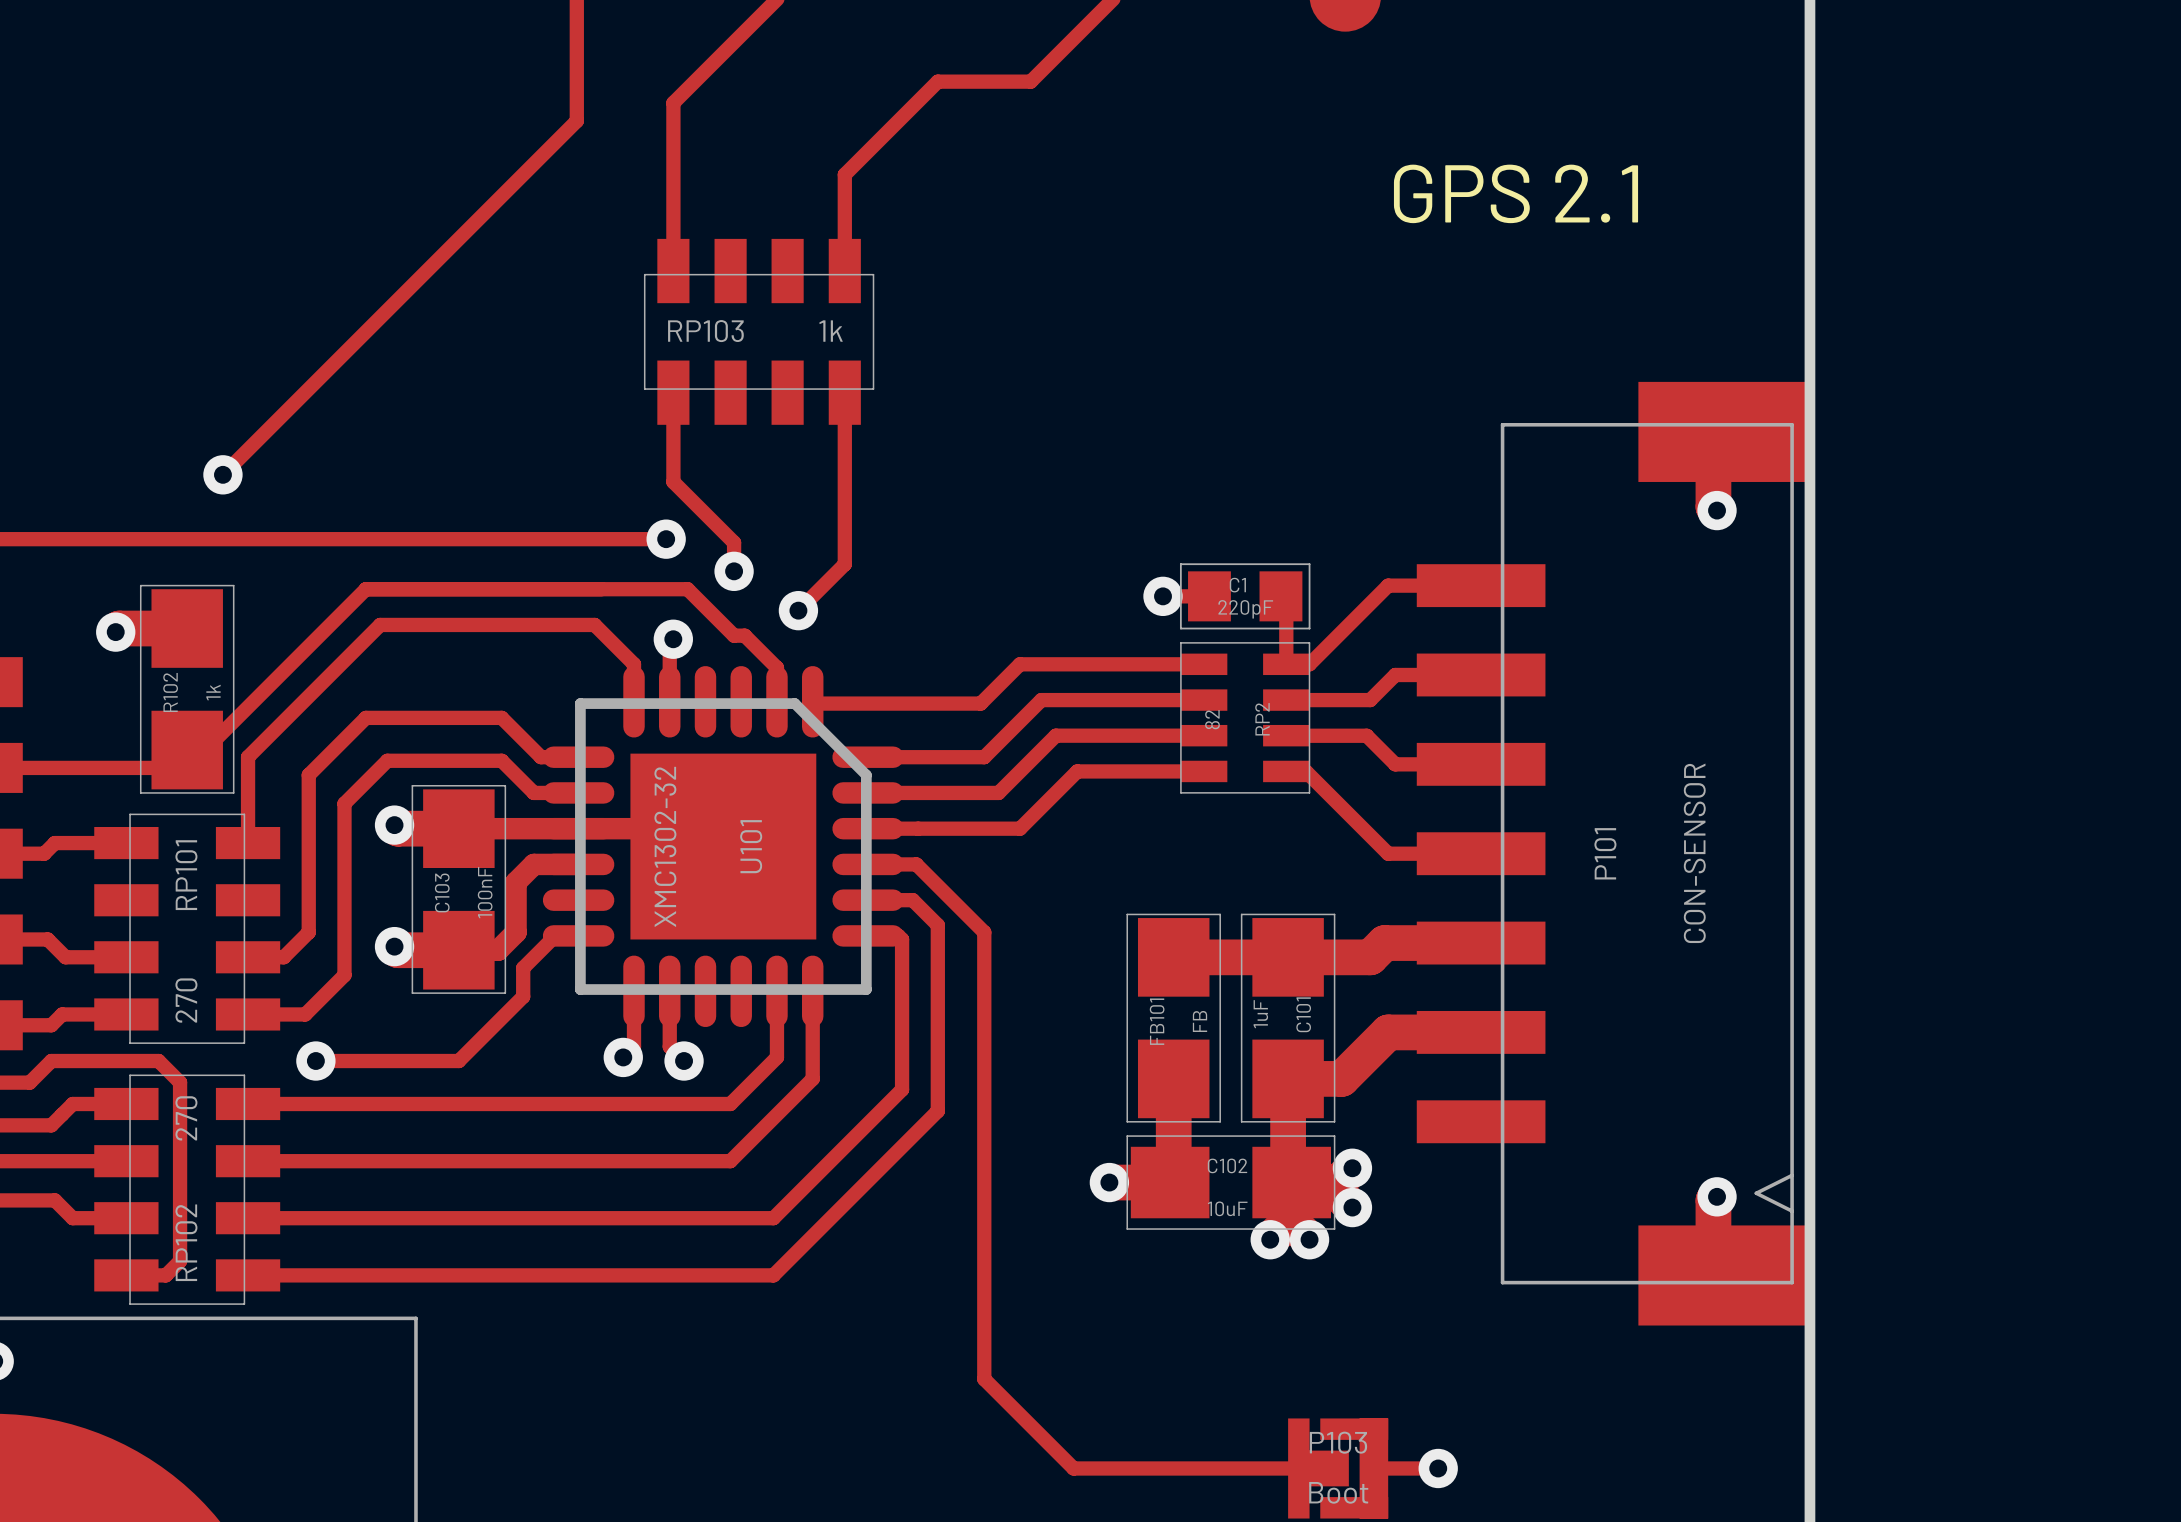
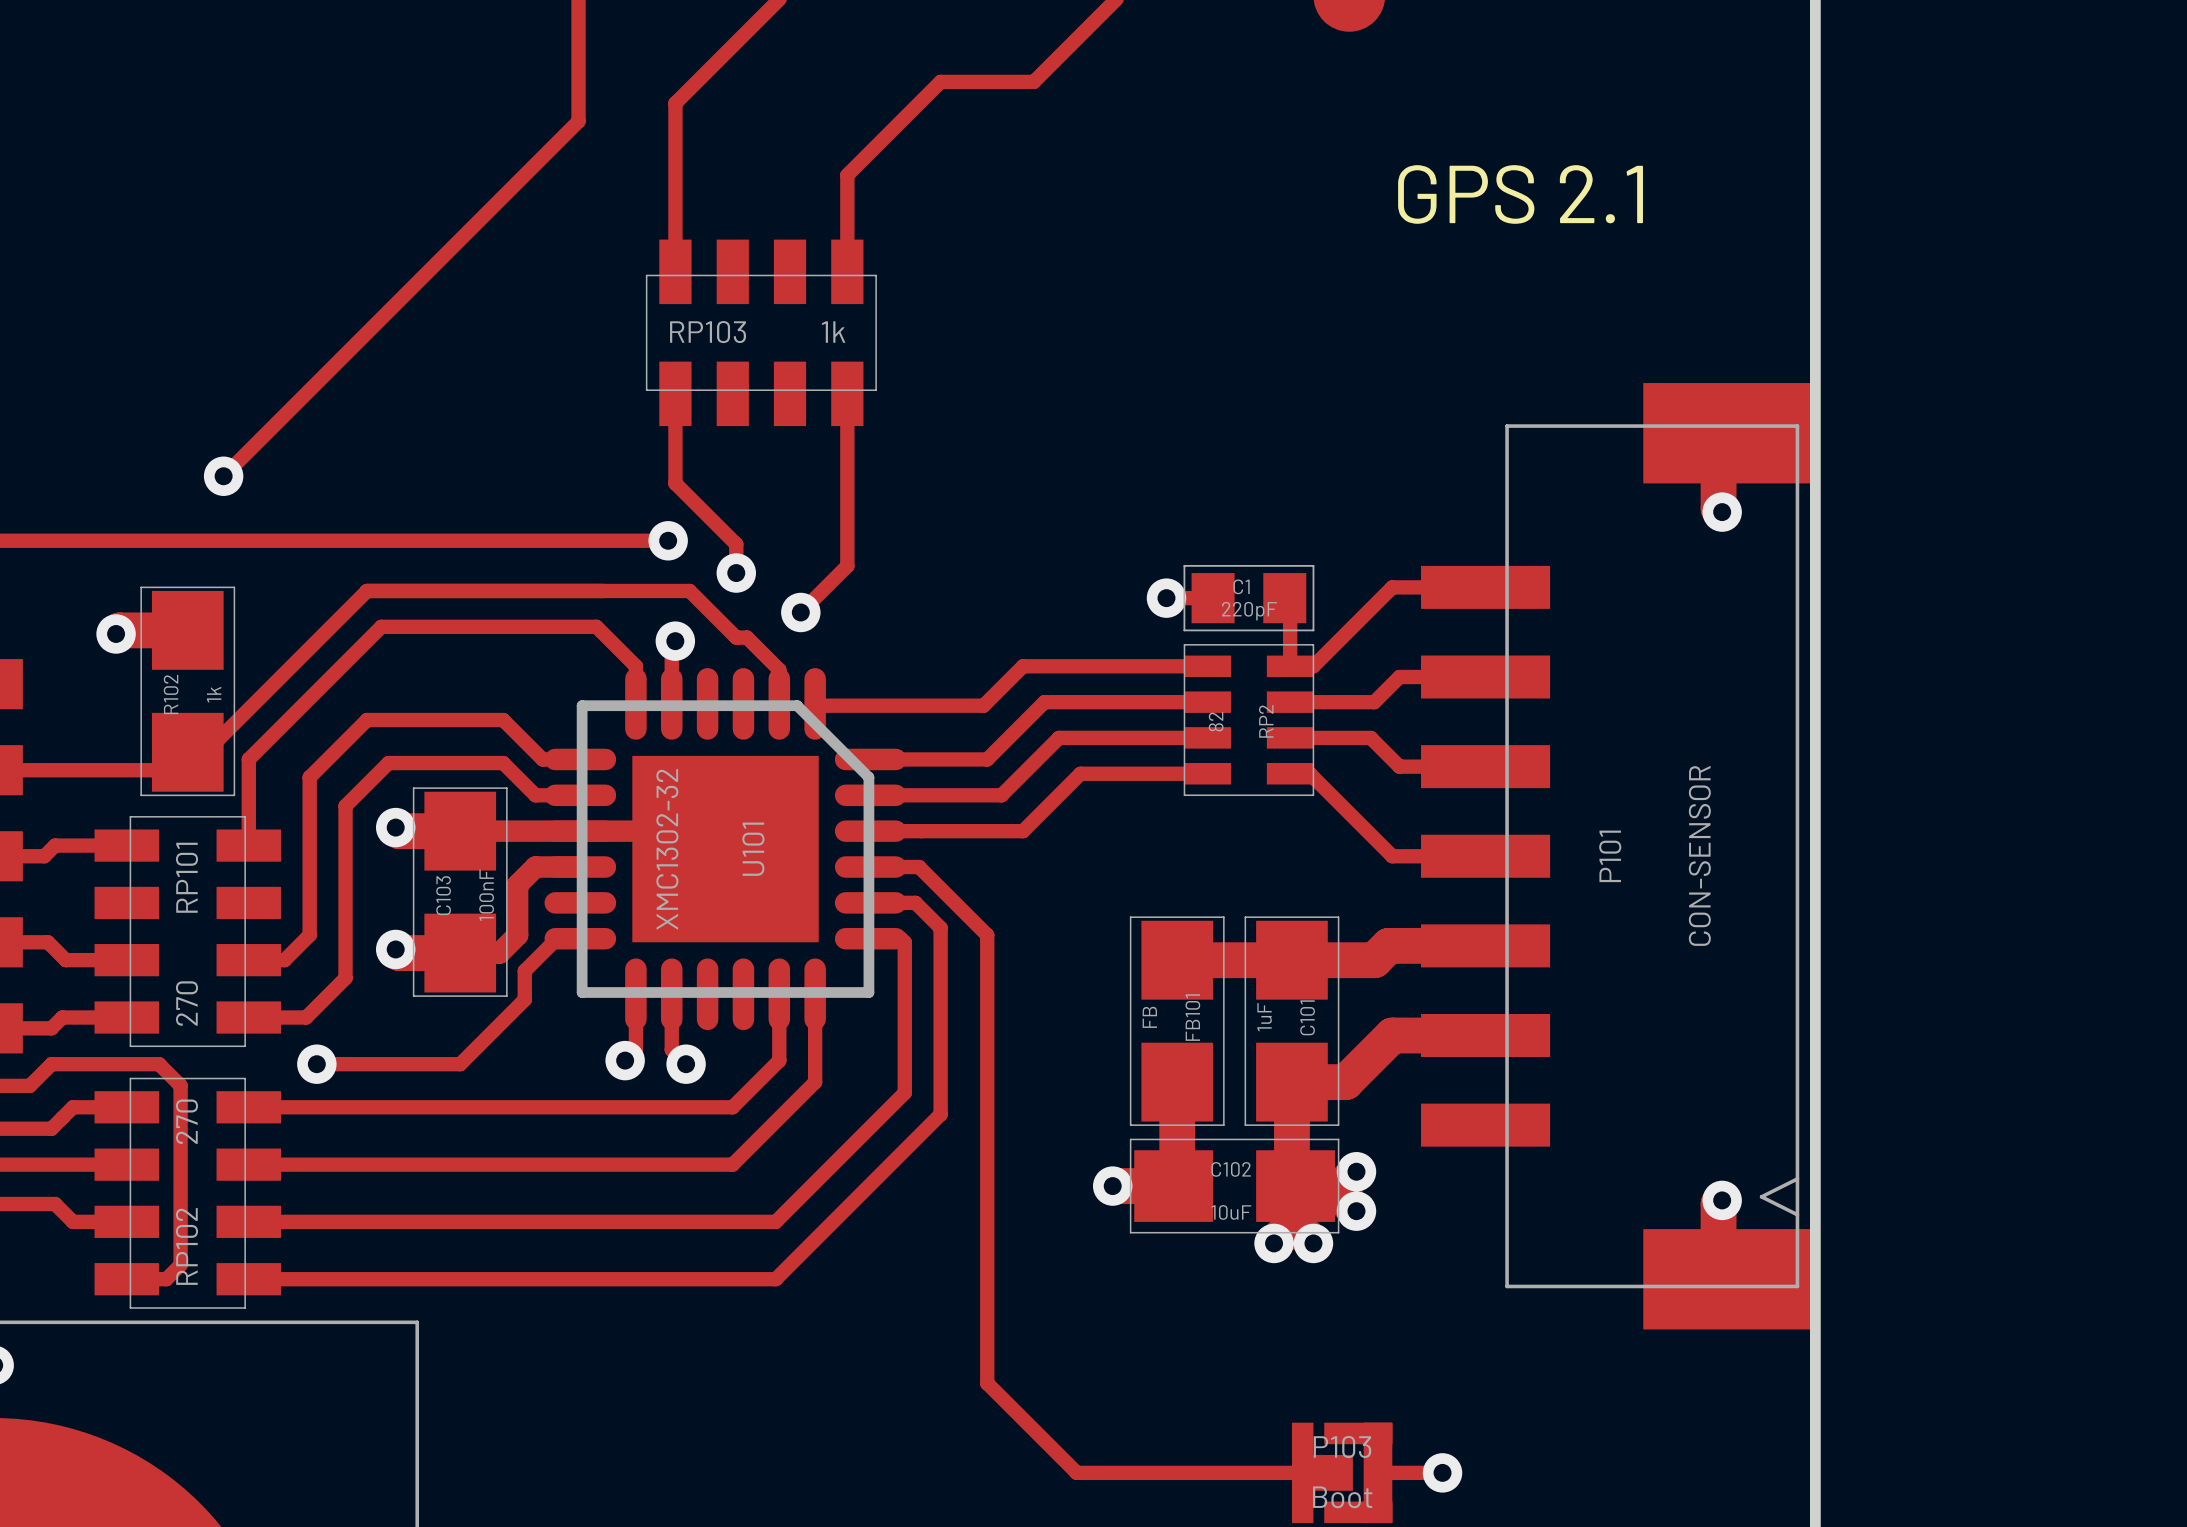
FB101 name position: FB101 (1157, 1021) -> FB101 (1192, 1017)
FB101 value position: FB (1200, 1021) -> FB (1149, 1017)

